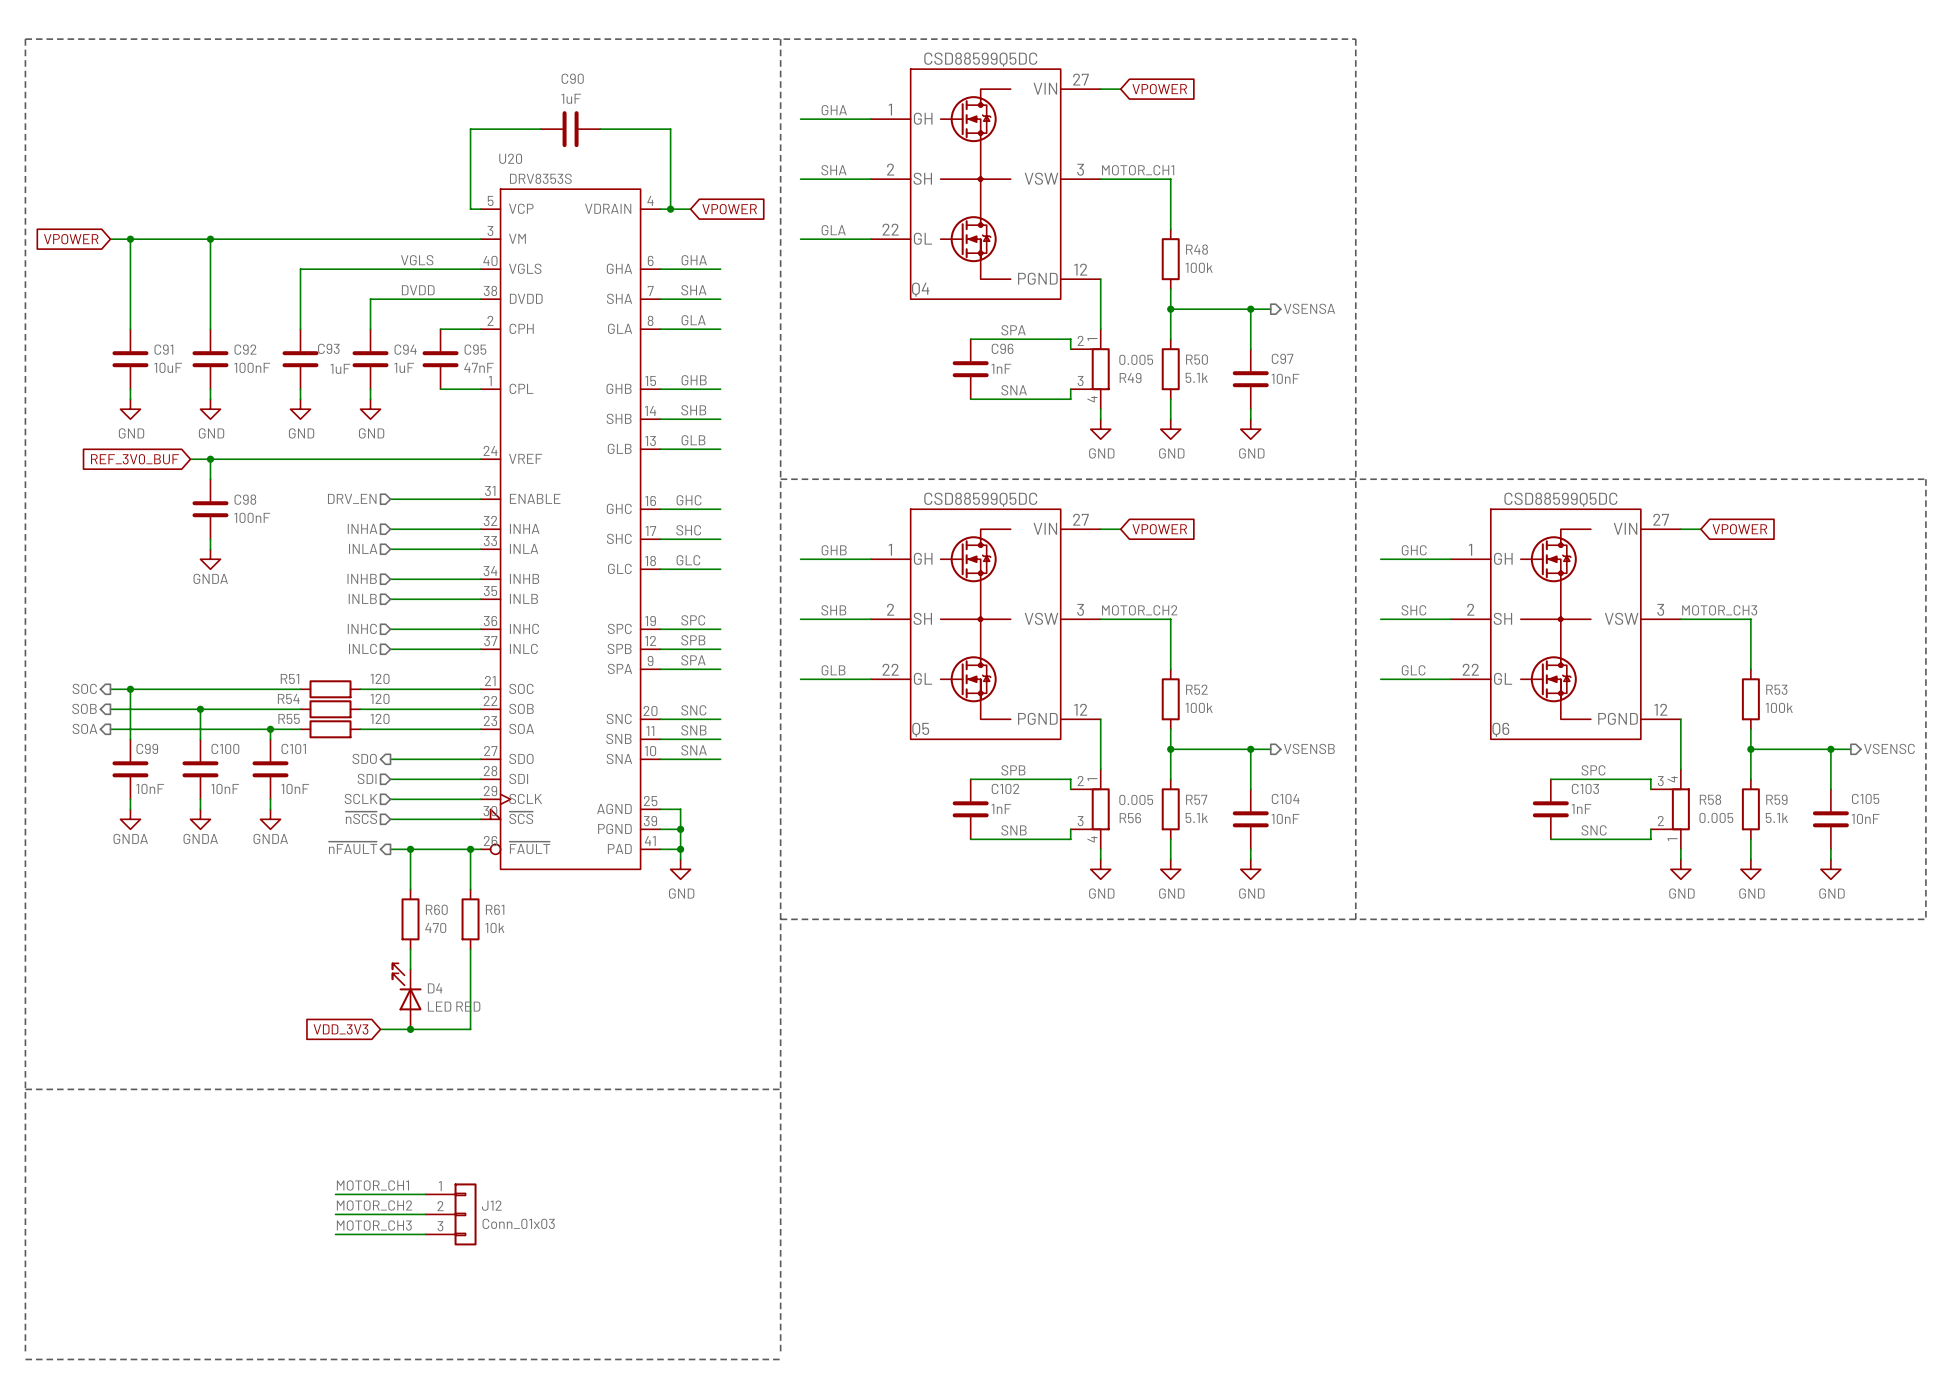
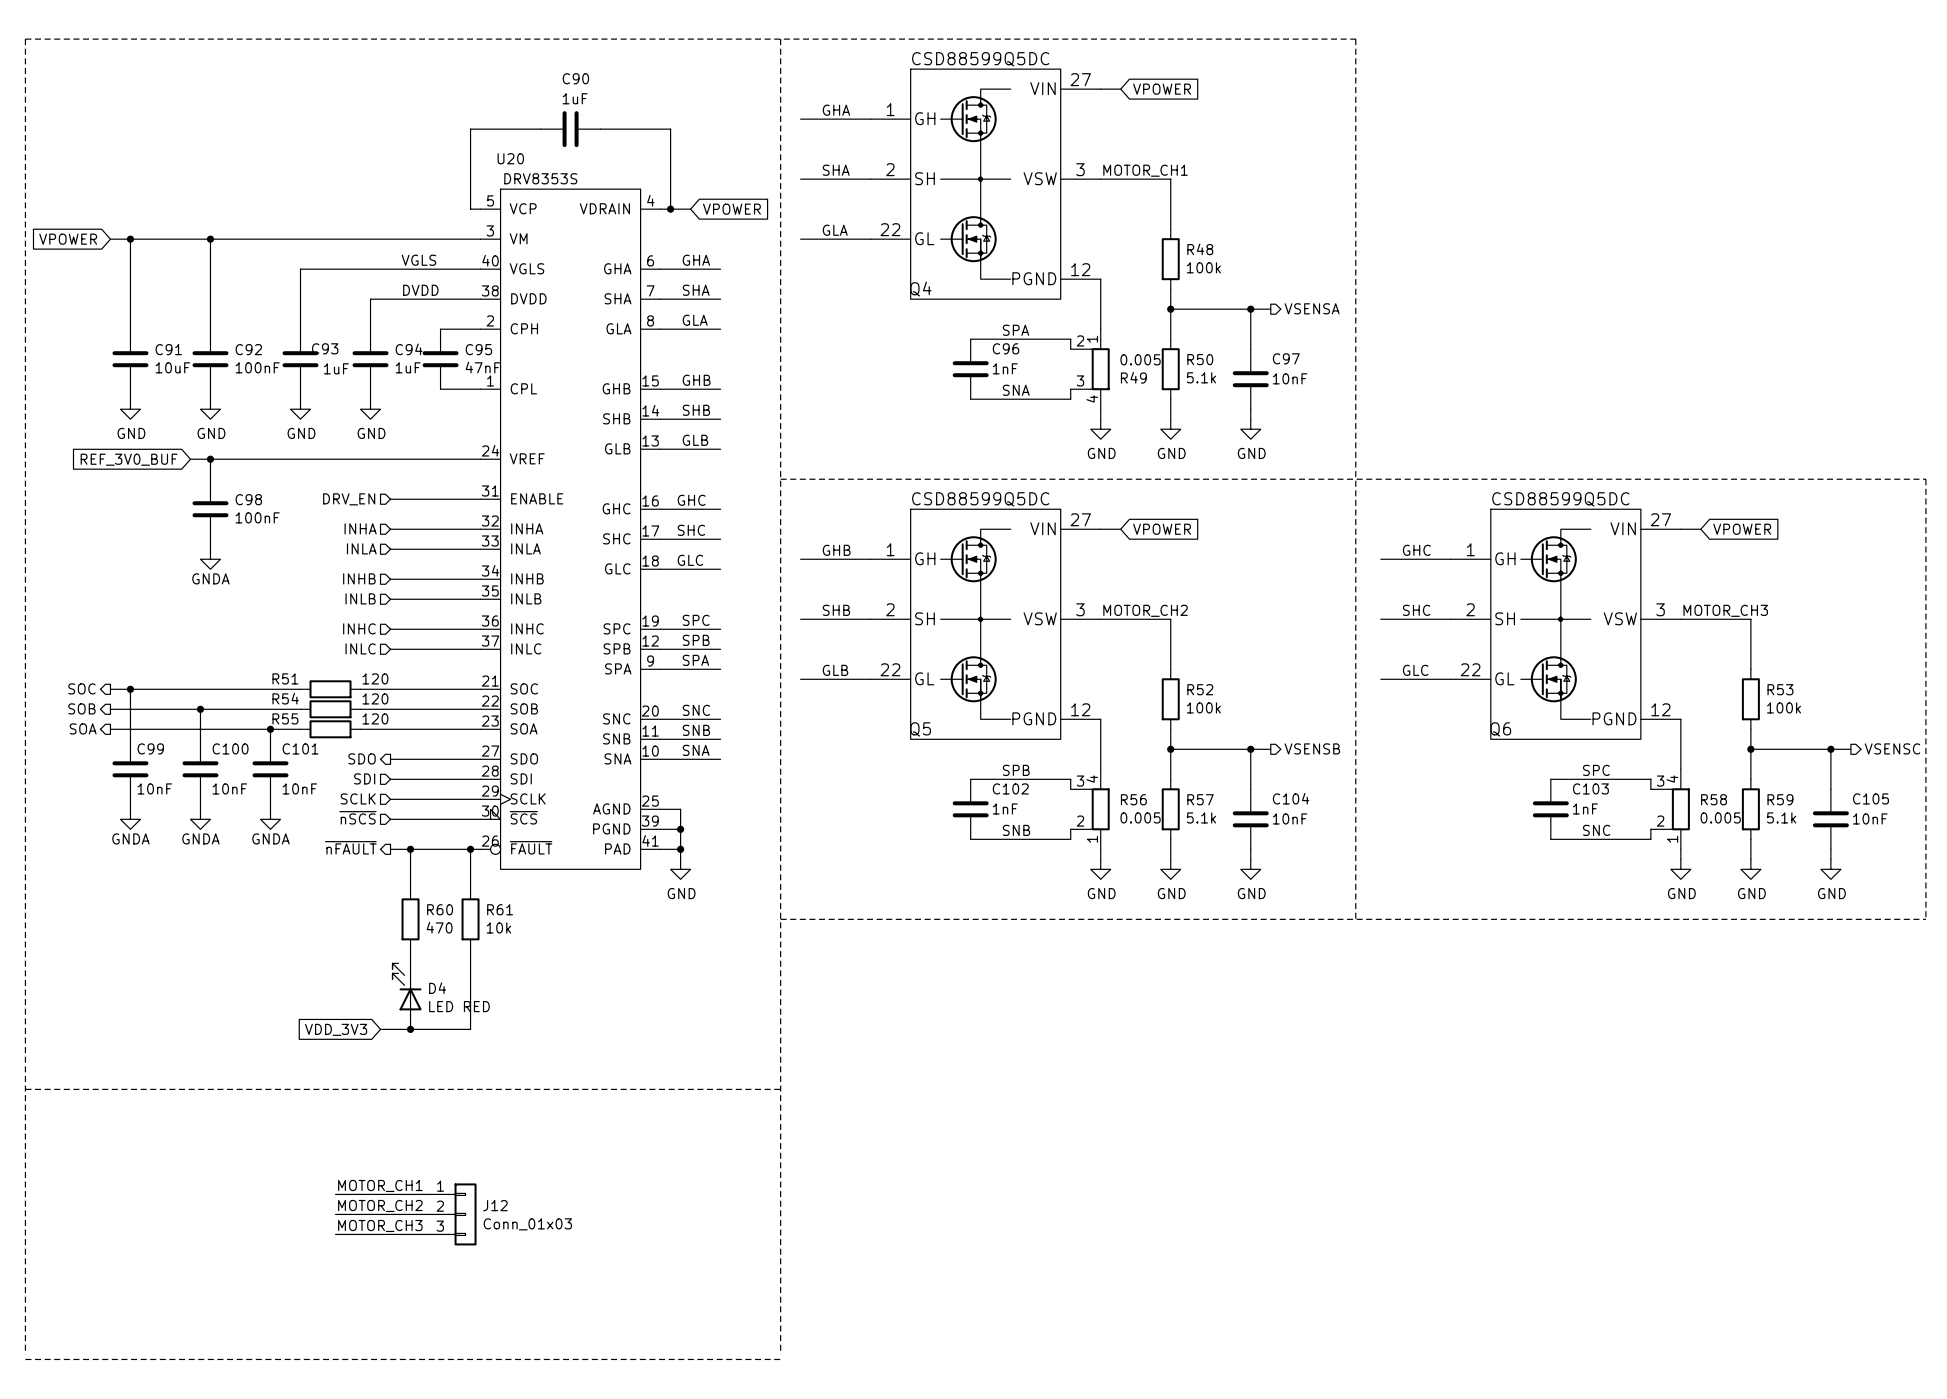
R56 flip: as is (1100, 809) -> up-down (1100, 809)

